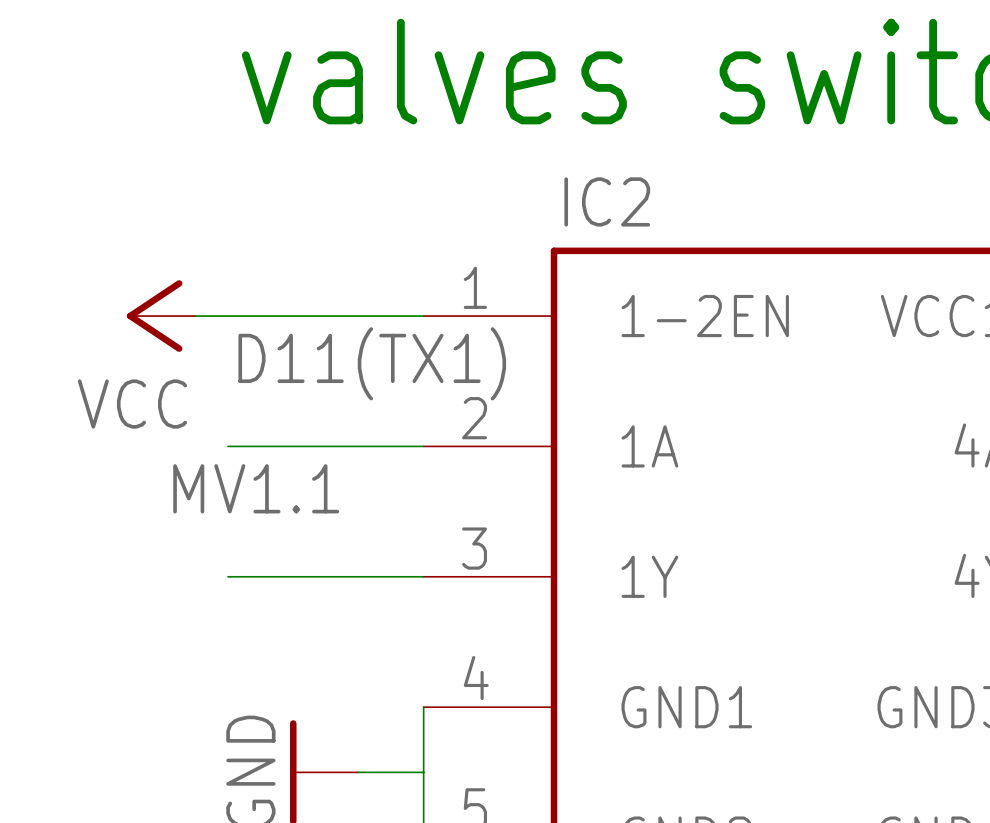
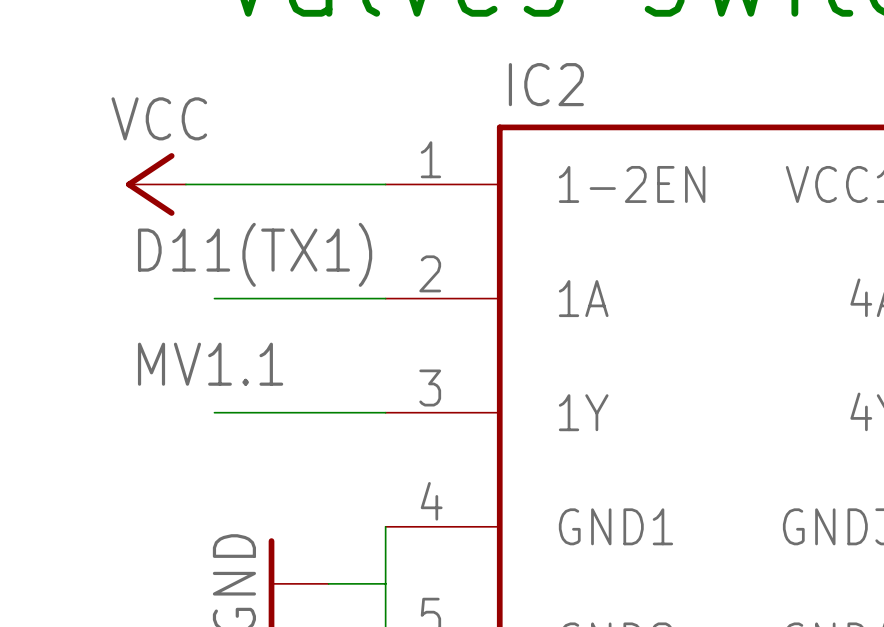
label position: D11(TX1) (372, 363) -> D11(TX1) (255, 254)
power symbol text position: VCC (132, 404) -> VCC (159, 118)
label position: MV1.1 (256, 488) -> MV1.1 (210, 364)

